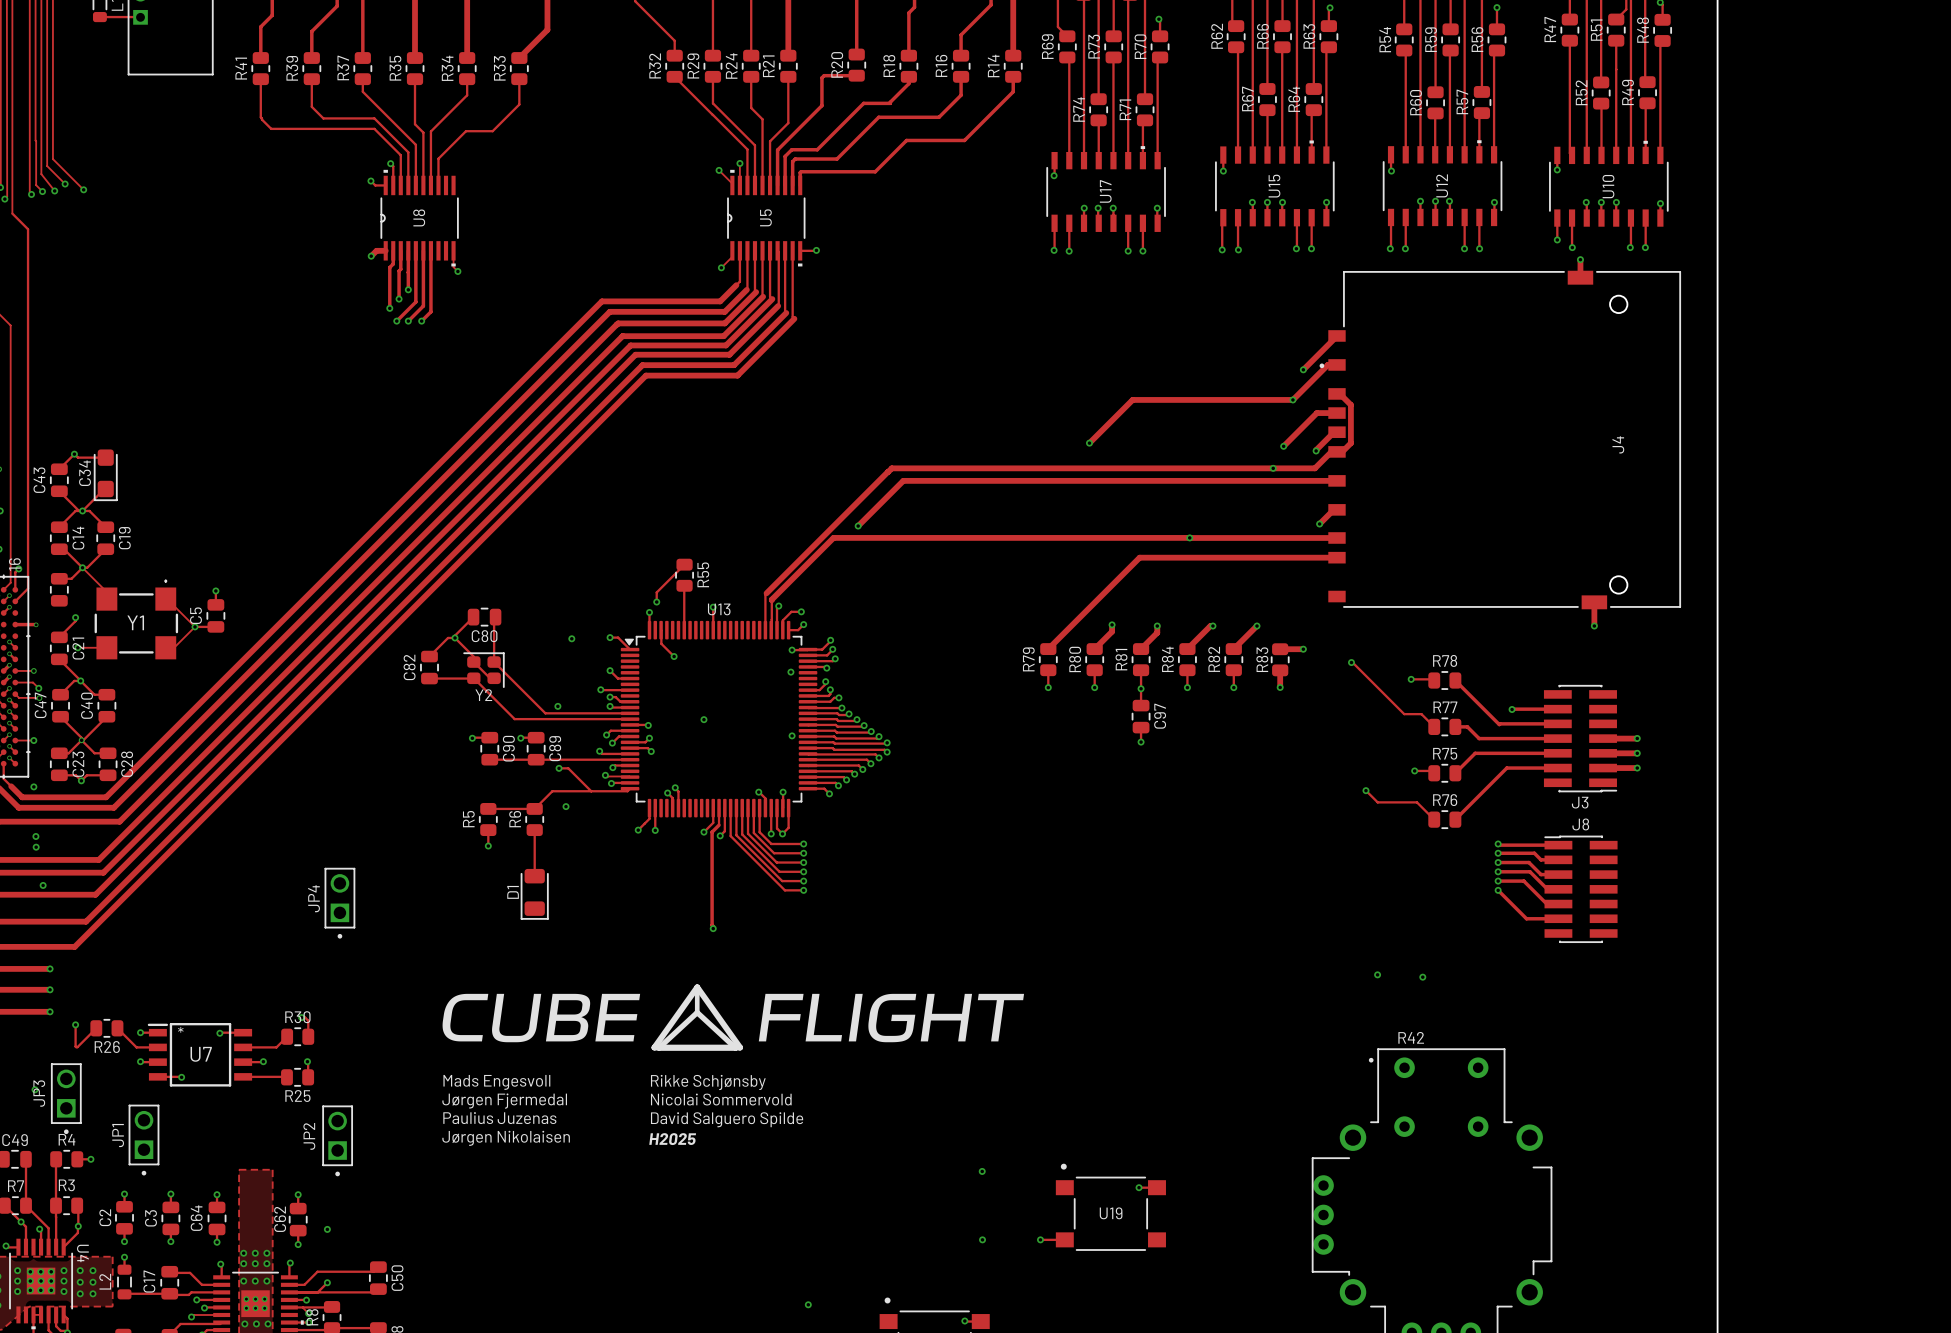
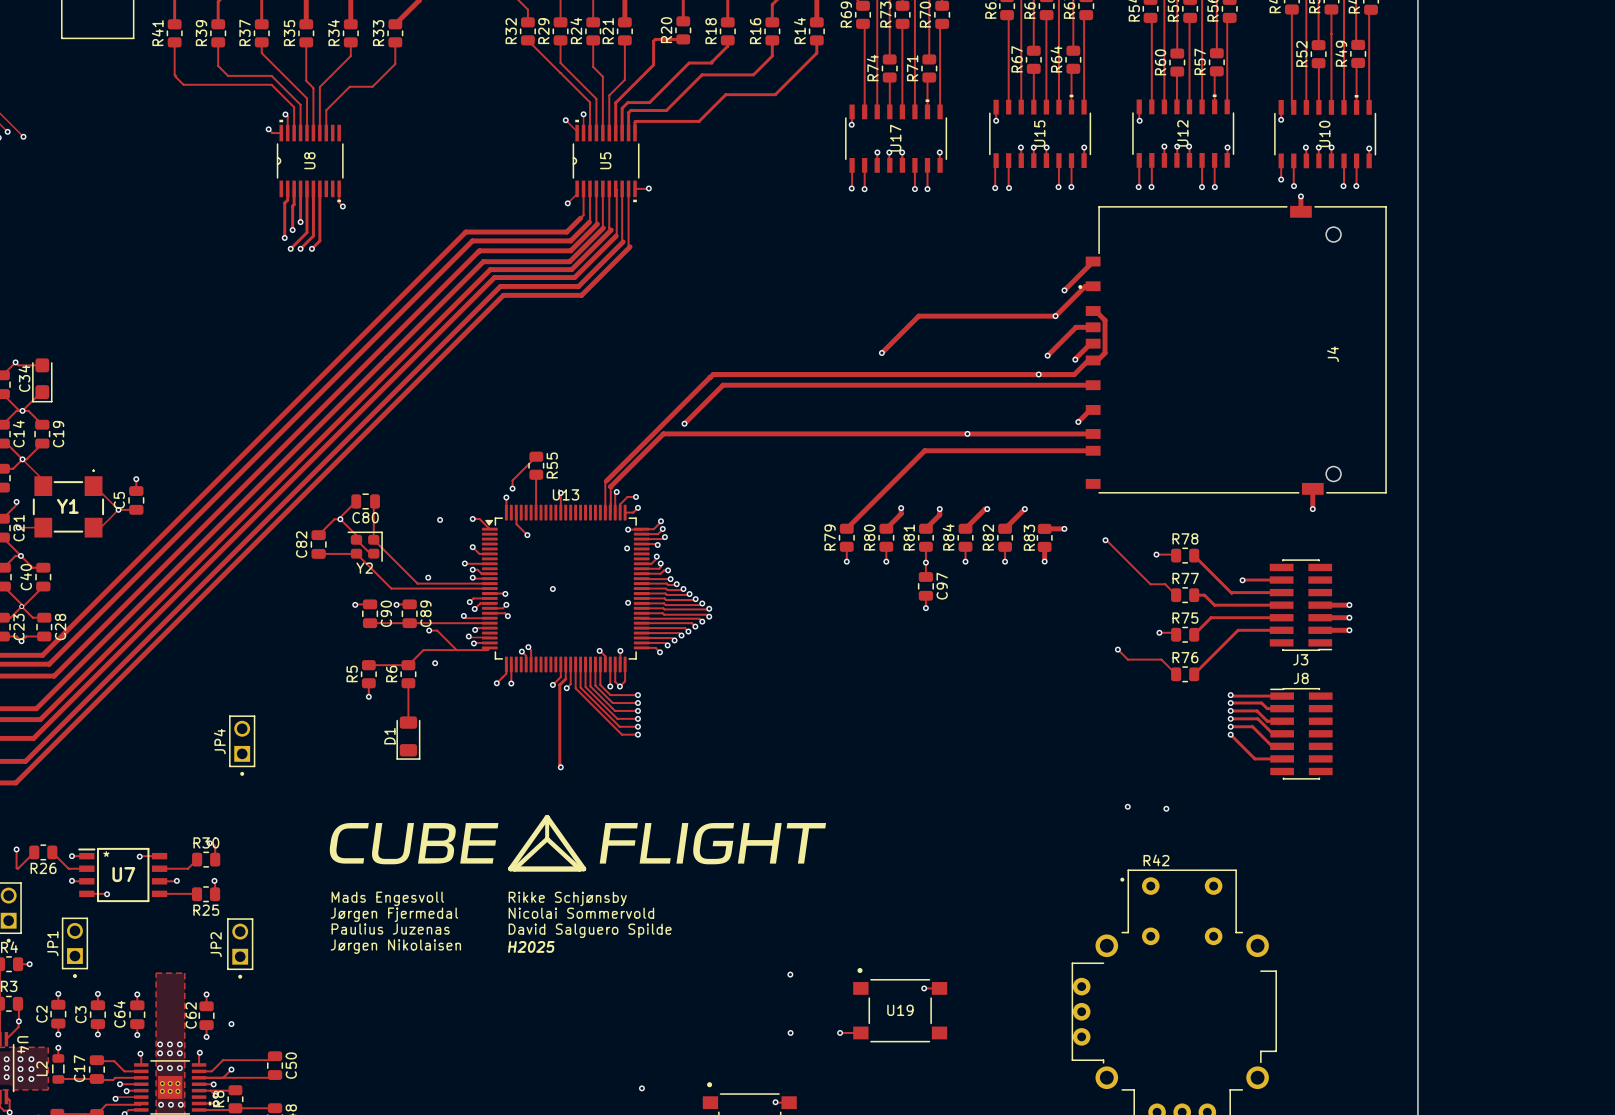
track: (385, 250) (376, 250) (371, 256) -> none
via: (371, 256) -> none

